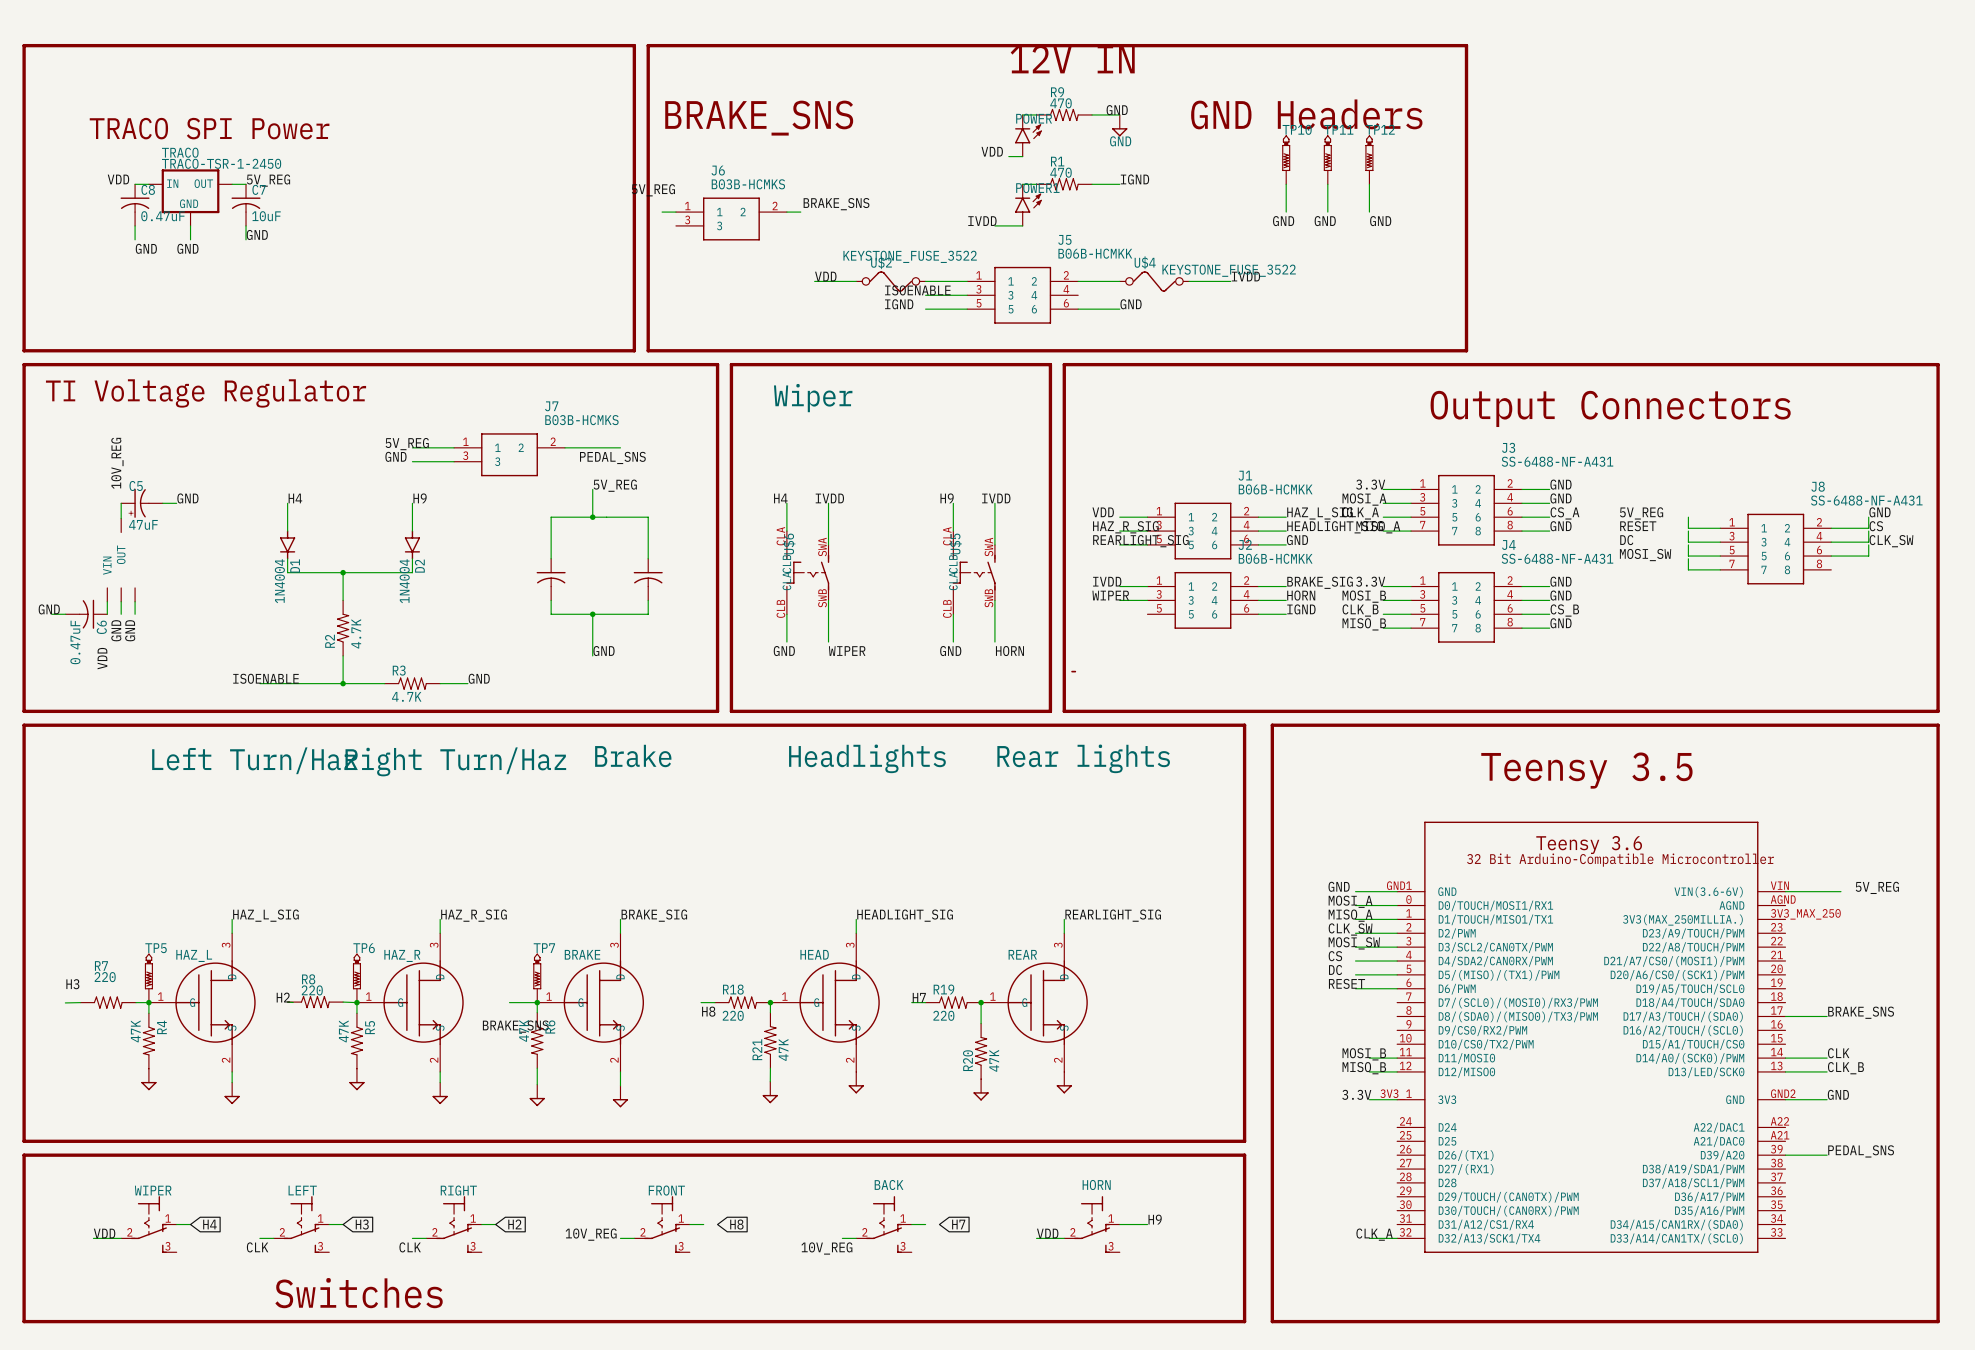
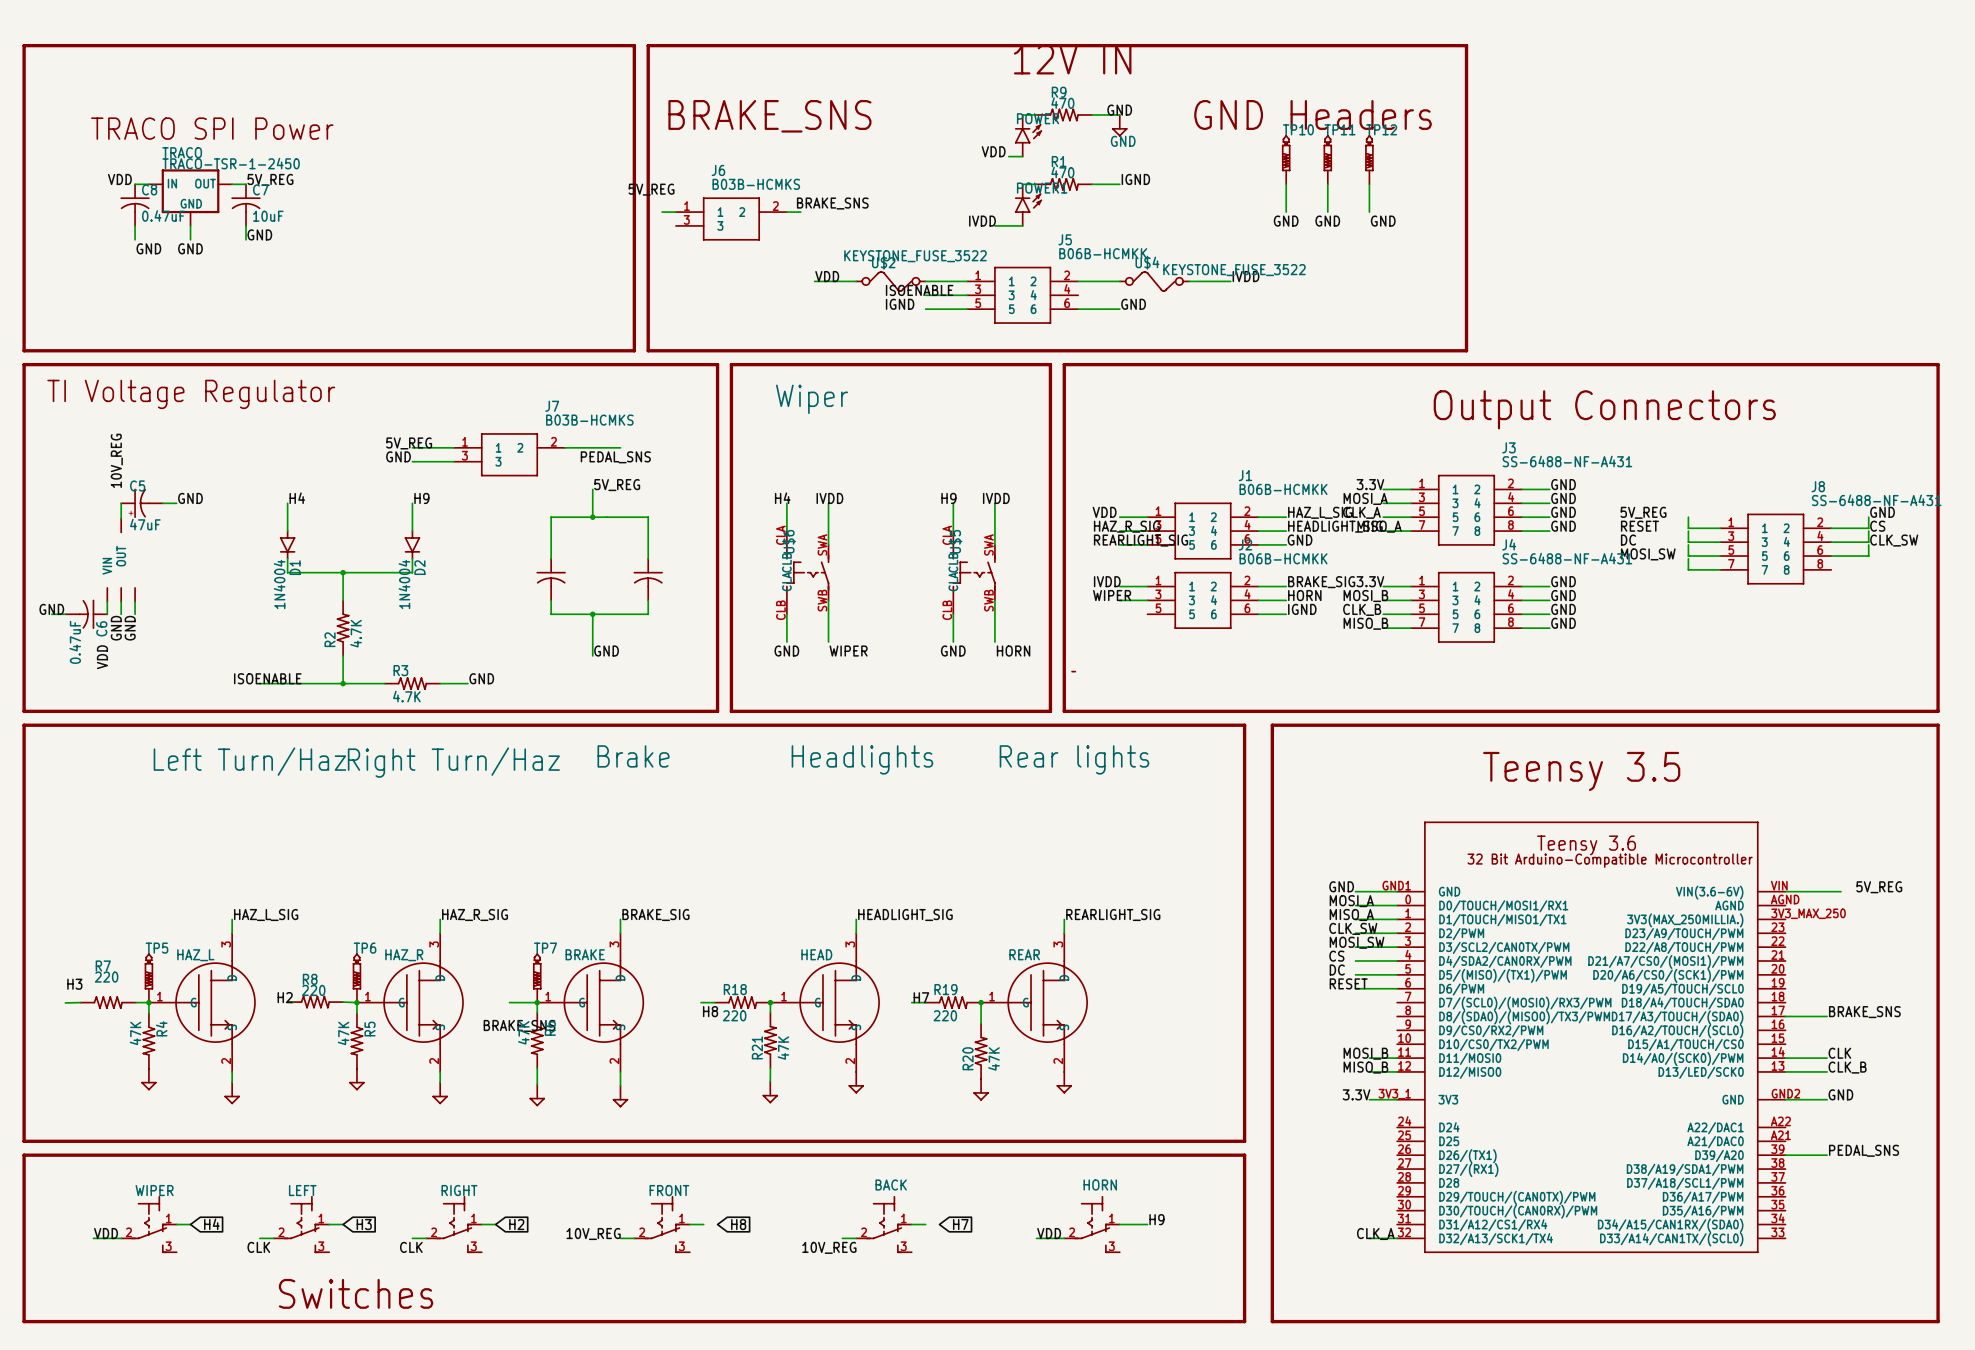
label: CS_A (1564, 513) -> GND (1563, 512)
label: CS_B (1564, 610) -> GND (1563, 609)

